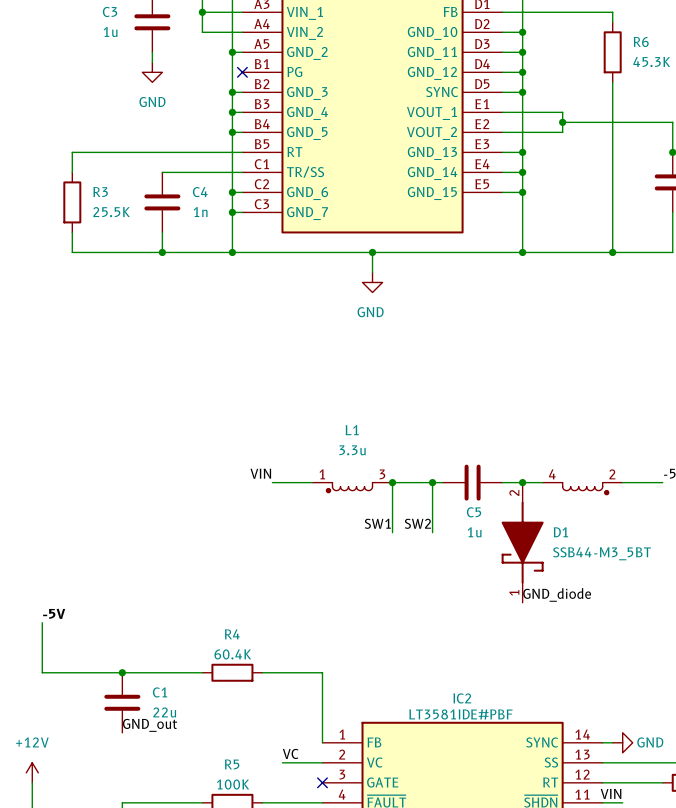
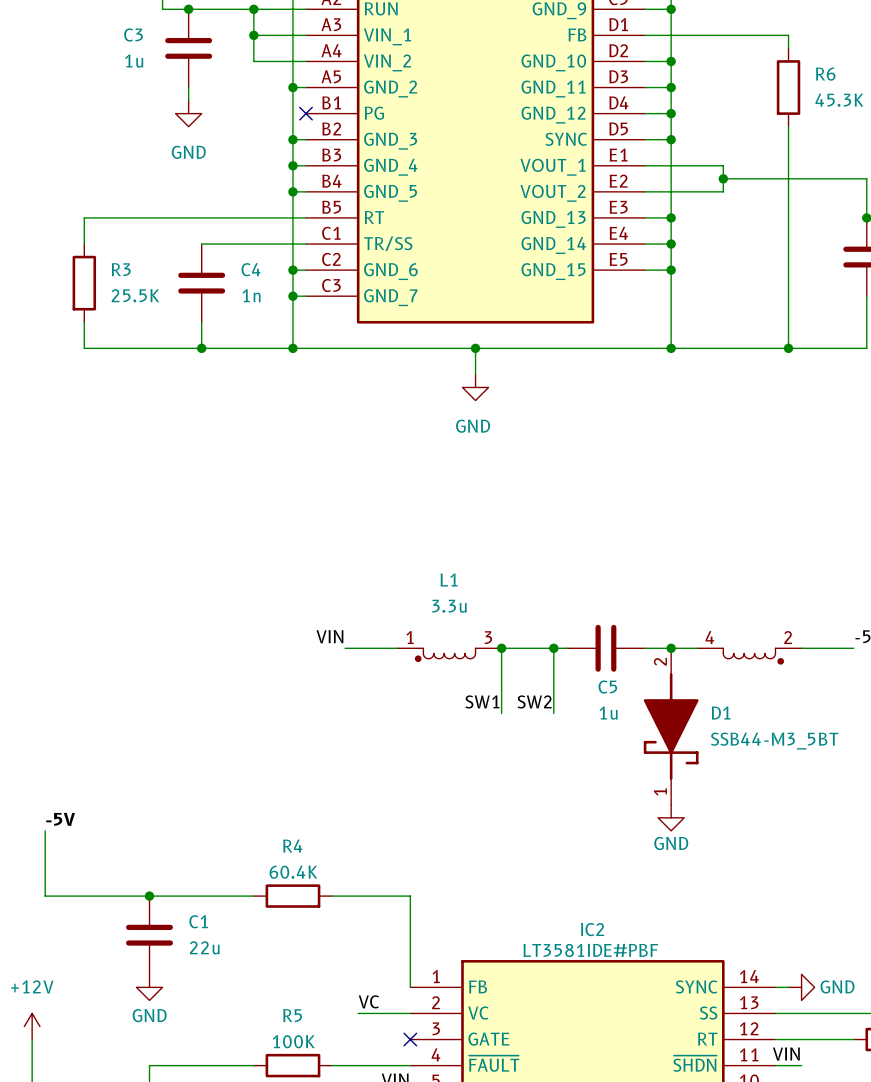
label: GND_diode (557, 594) -> none
power symbol: none -> GND (671, 817)
label: GND_out (150, 725) -> none
power symbol: none -> GND (149, 987)

